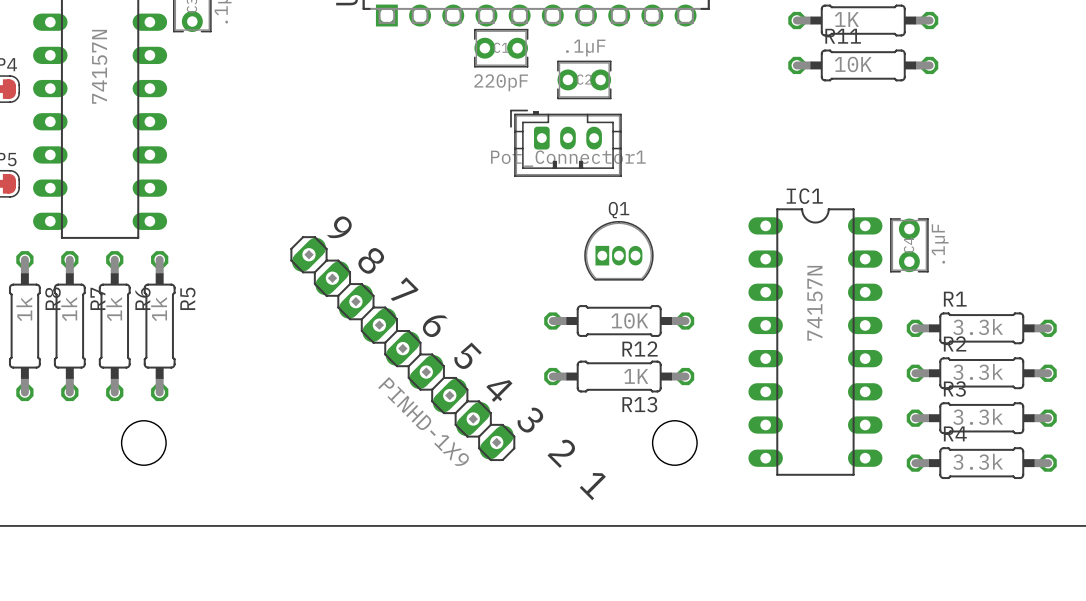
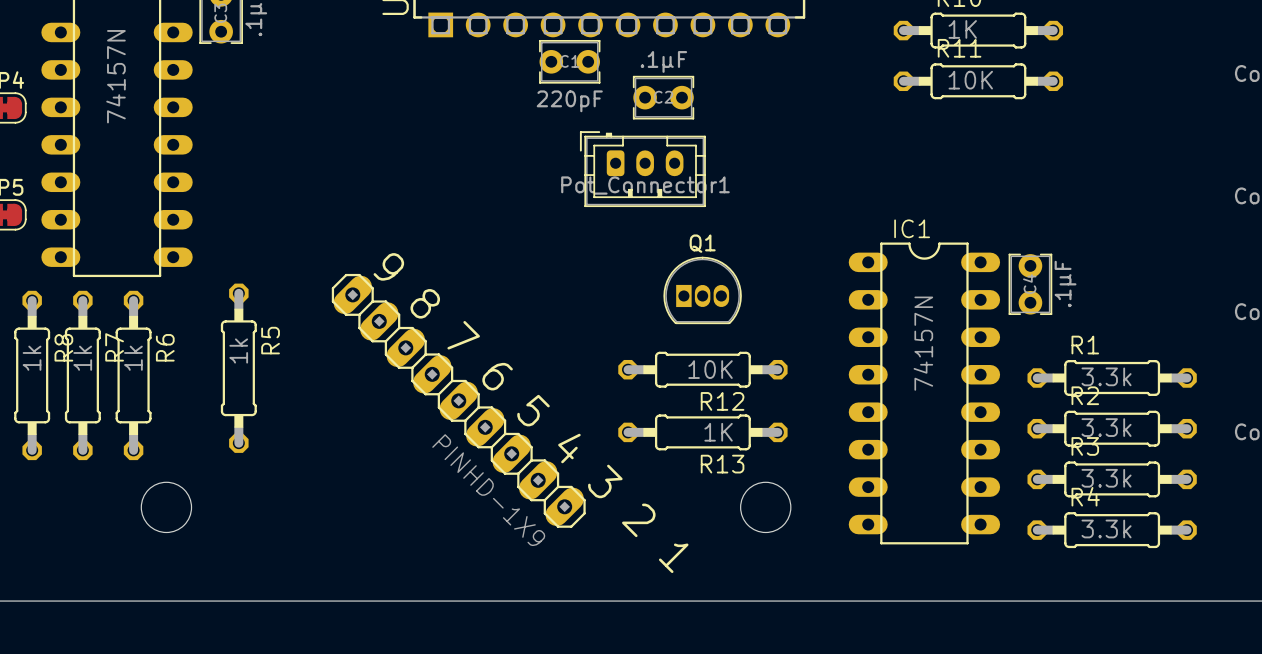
R5 position: (159, 326) -> (238, 368)

